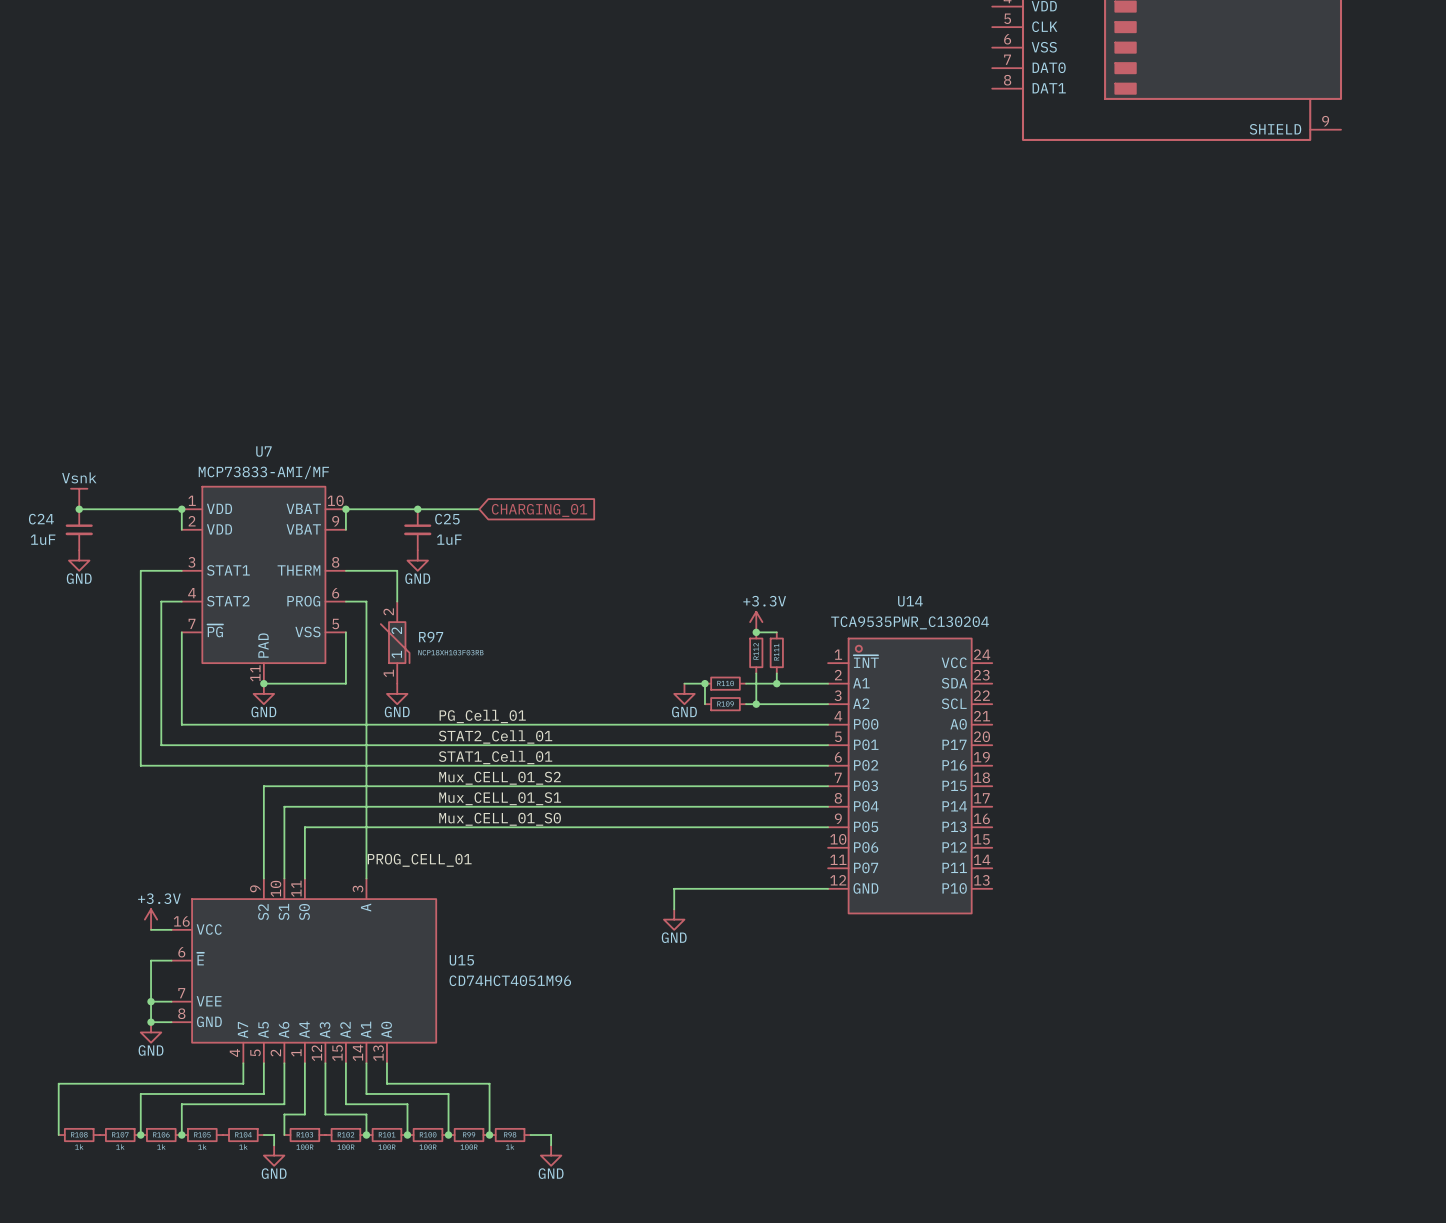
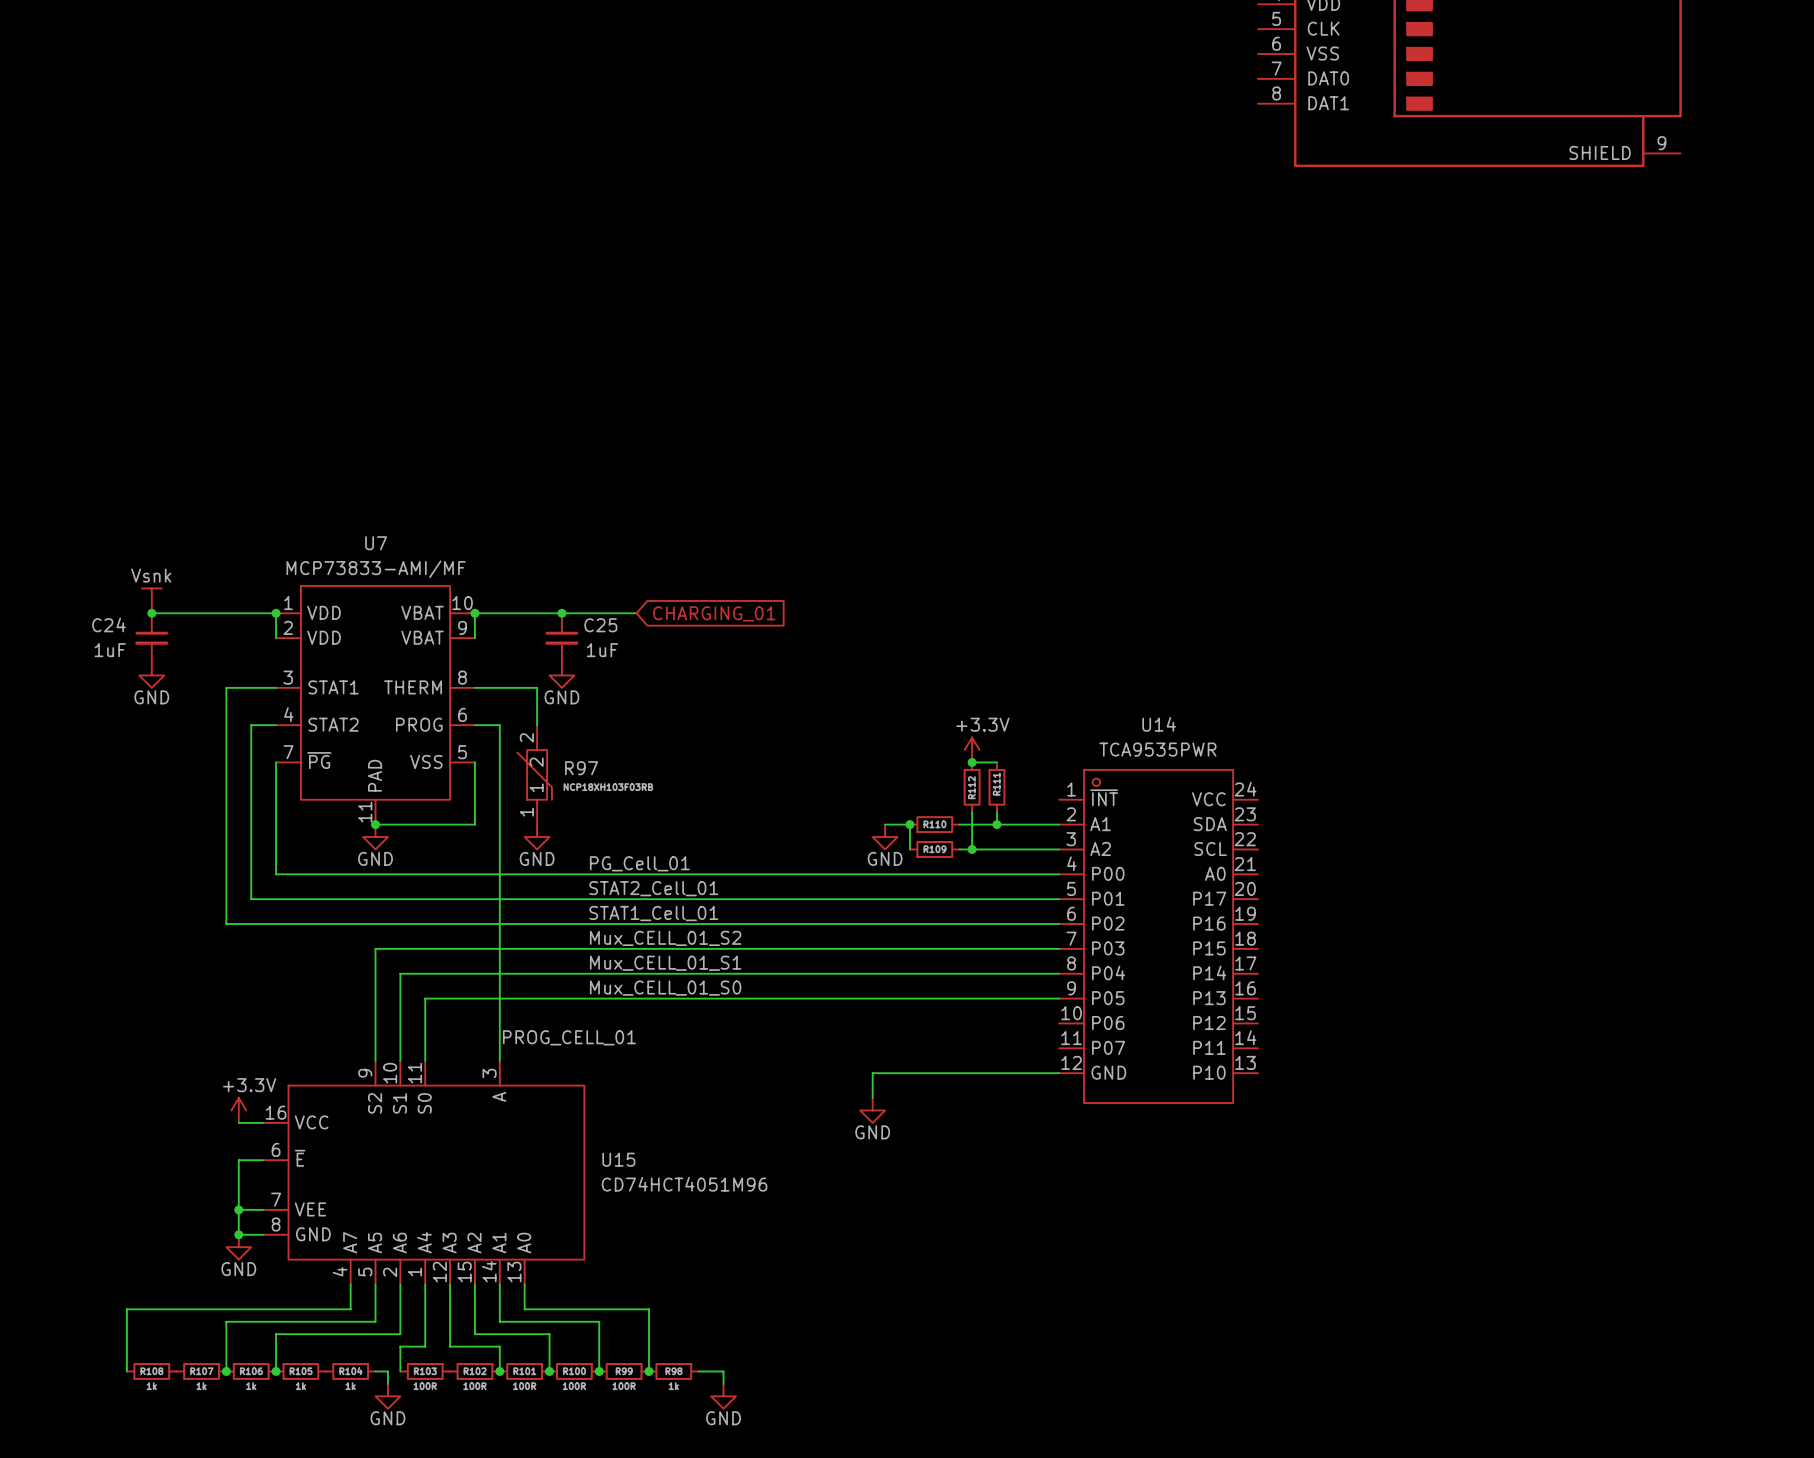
U14 value: TCA9535PWR_C130204 (910, 622) -> TCA9535PWR (1157, 749)

